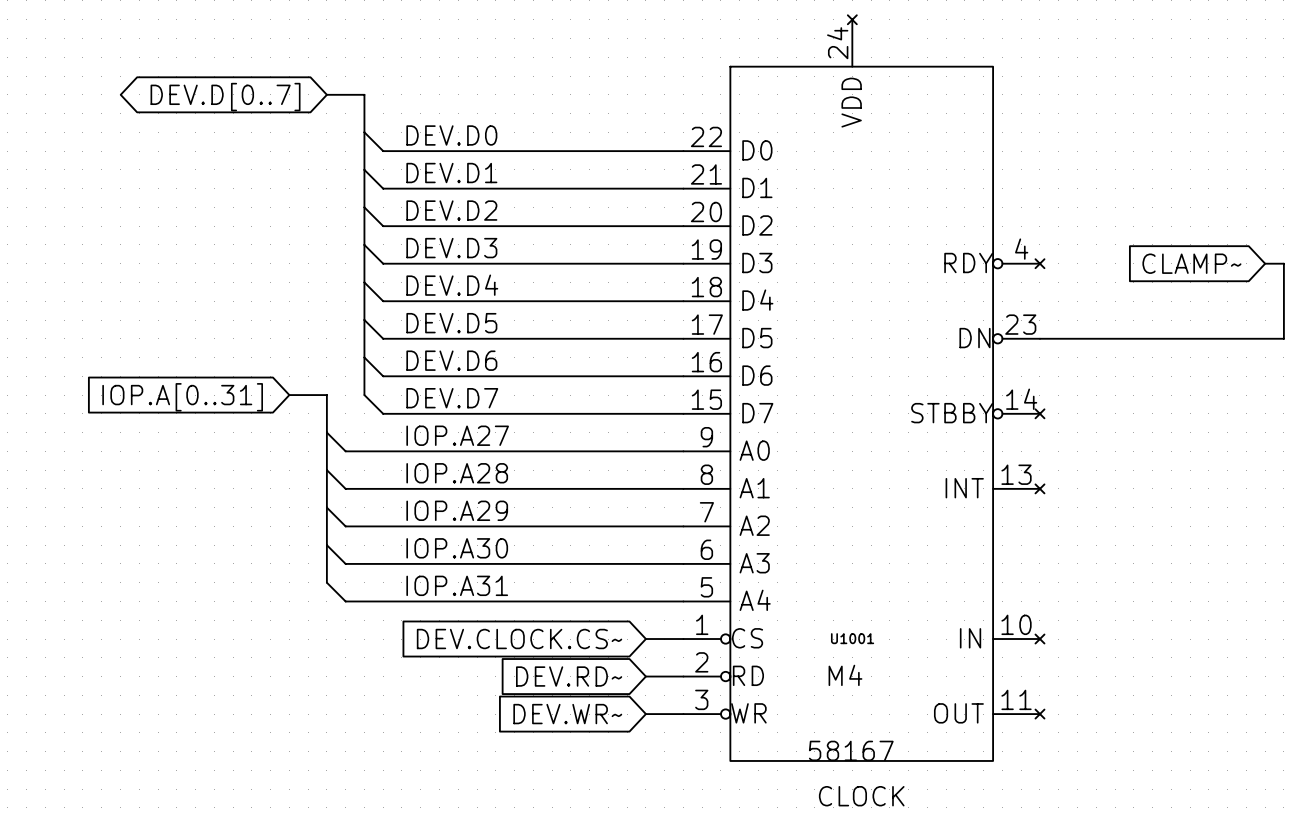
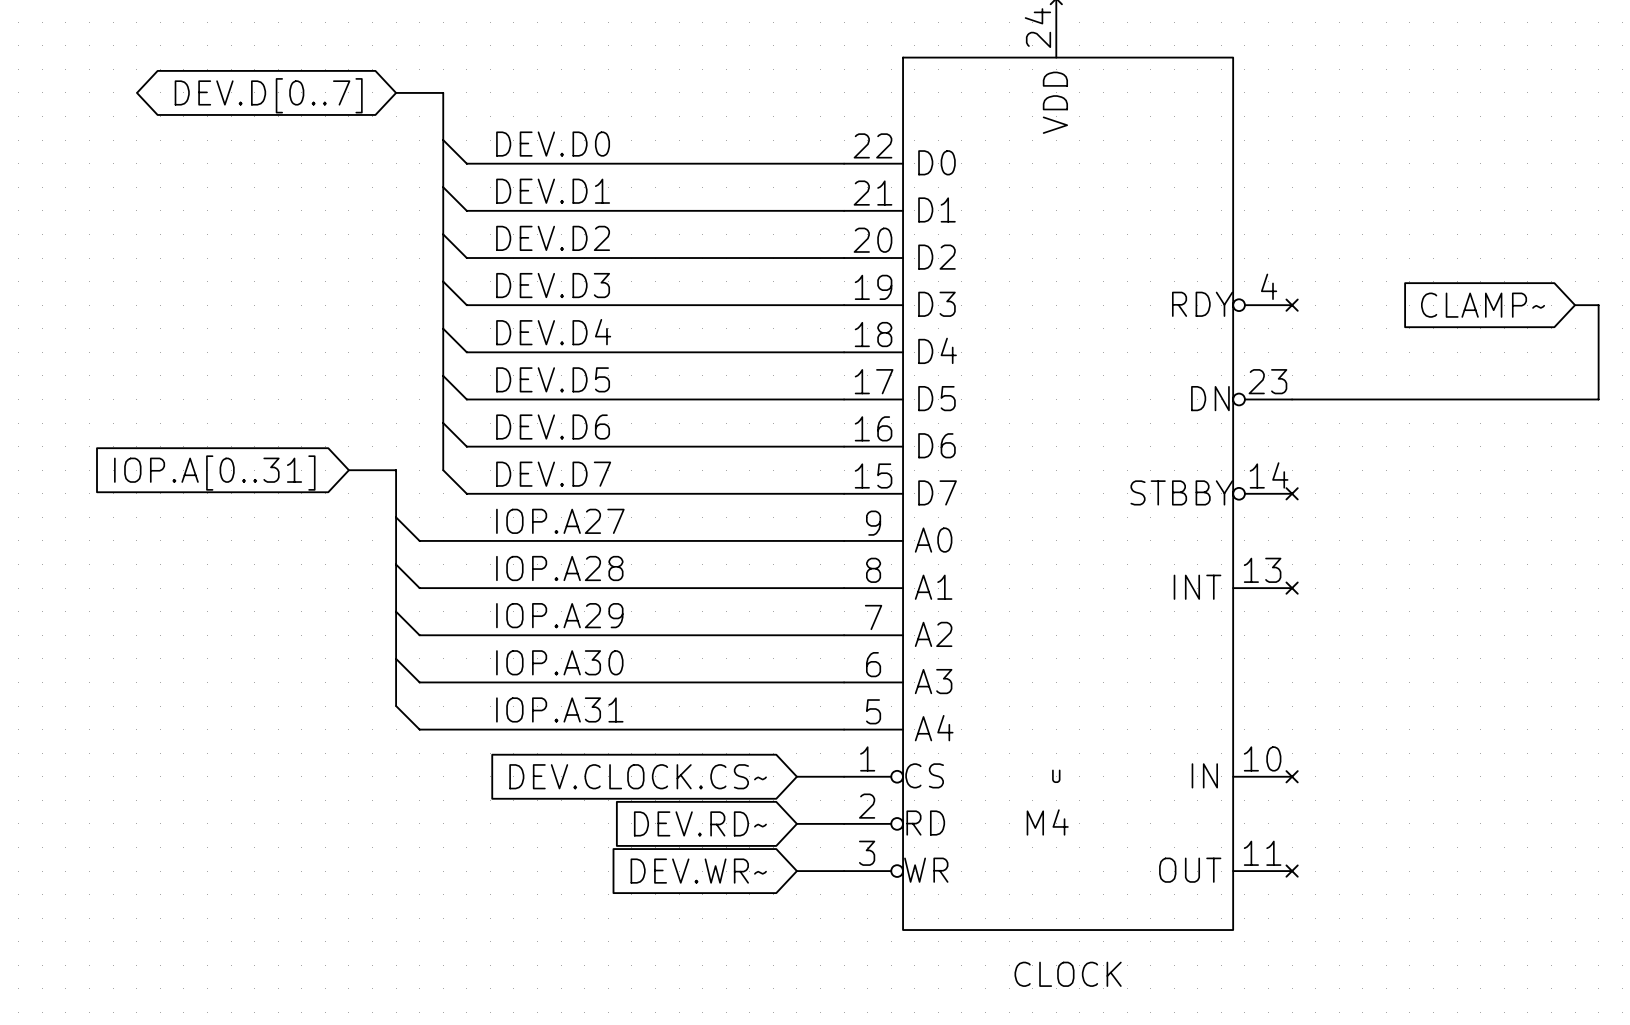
U1001 name: U1001 (852, 638) -> U (1056, 776)
U1001 value: 58167 (851, 750) -> none

